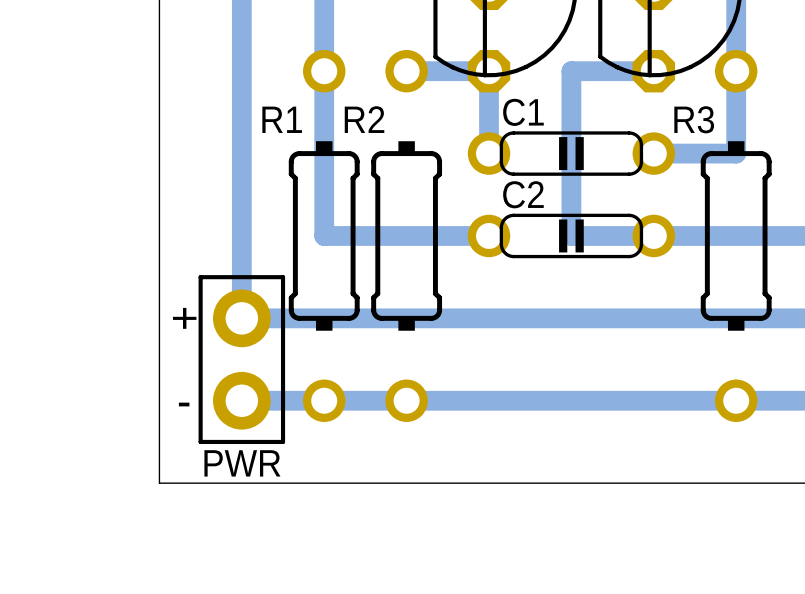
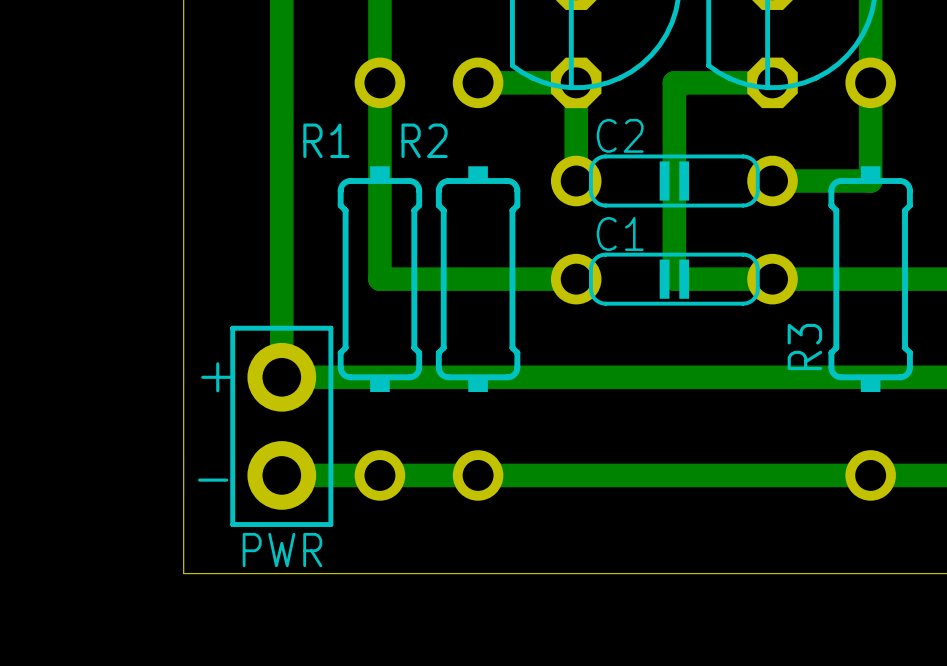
C1 name: C1 (523, 112) -> C2 (620, 135)
R3 name rotation: 0° (694, 119) -> 90° counterclockwise (804, 346)
R3 name position: R3 (694, 119) -> R3 (804, 346)
C2 name: C2 (523, 194) -> C1 (620, 234)

